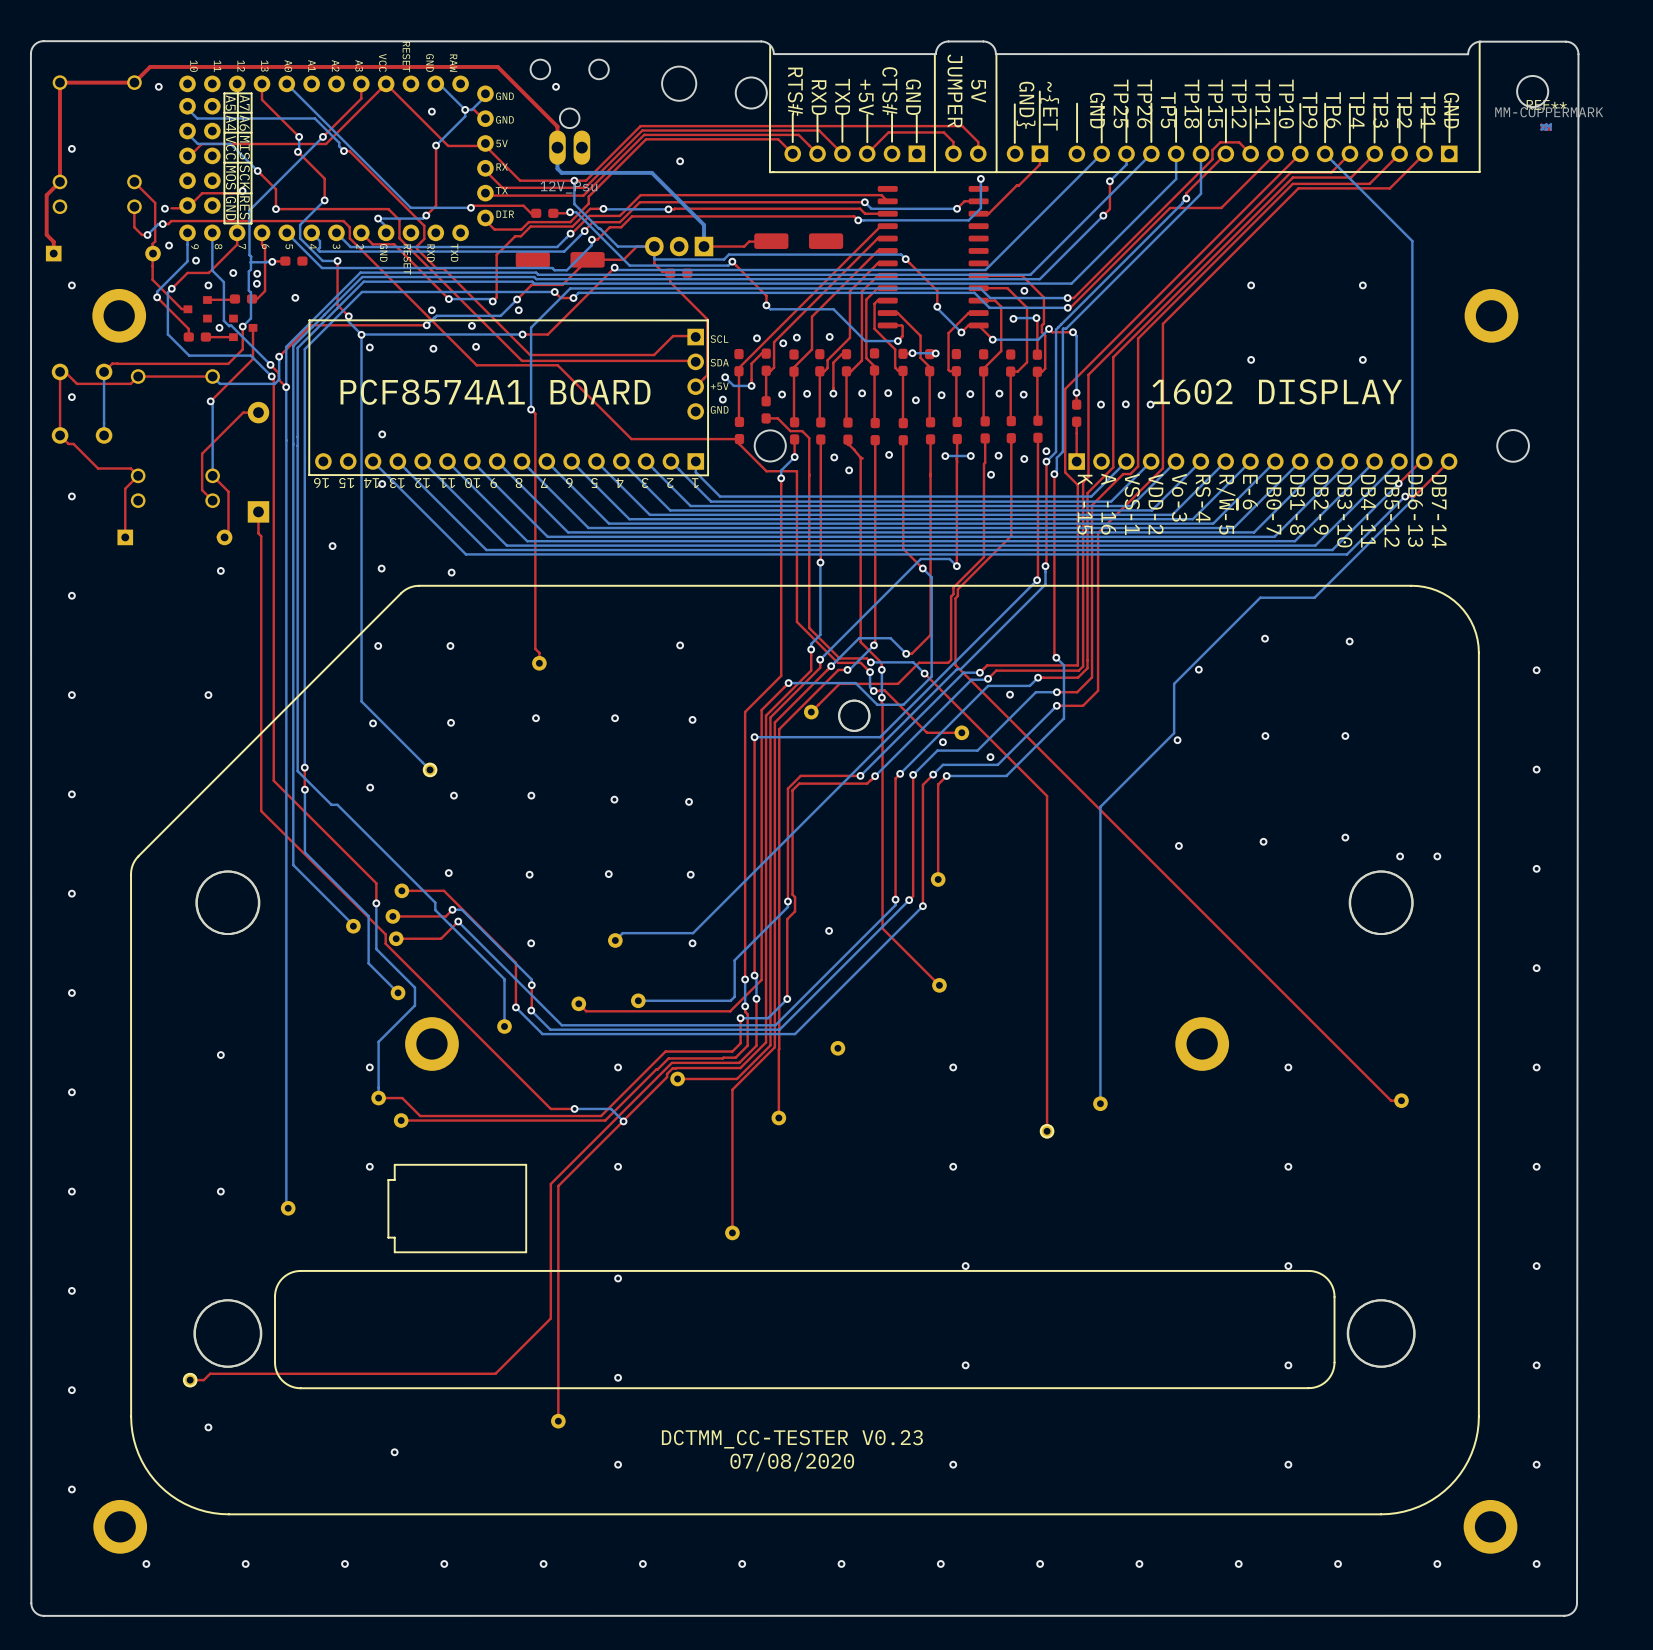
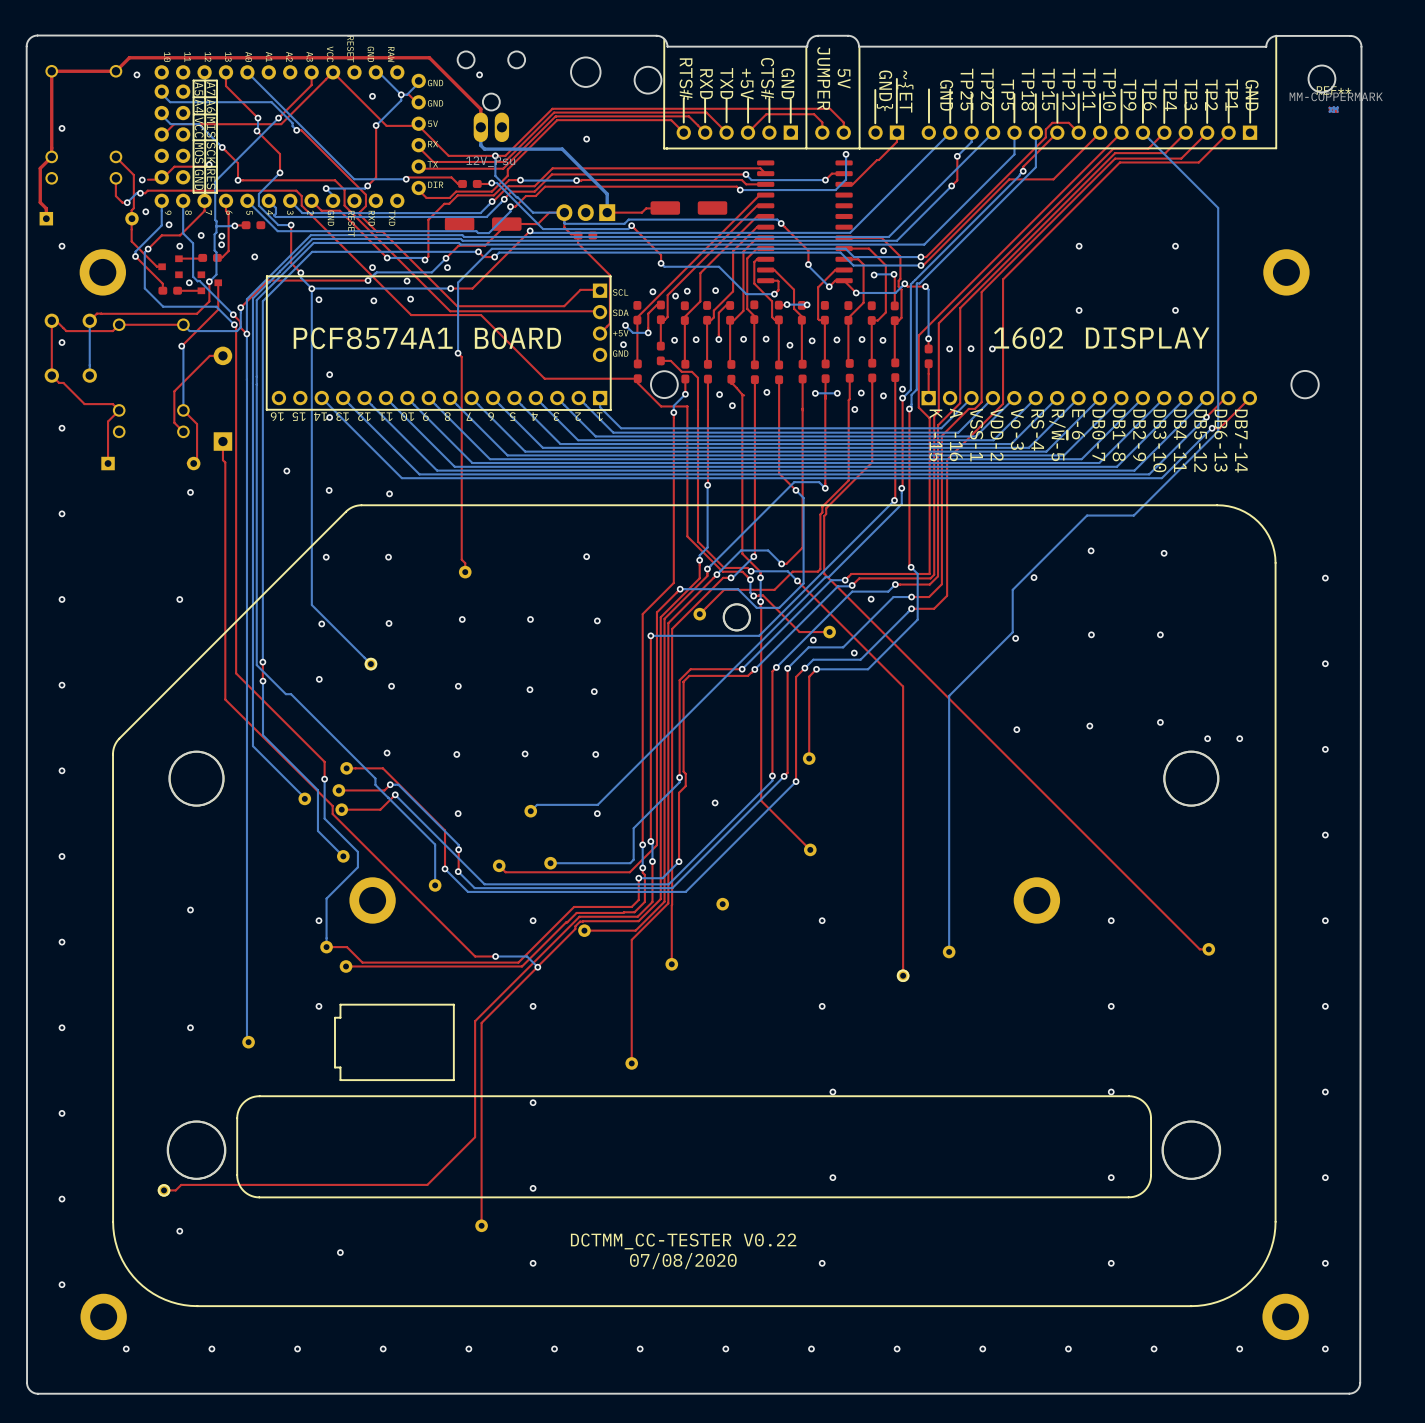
text: DCTMM_CC-TESTER V0.23 (792, 1439) -> DCTMM_CC-TESTER V0.22 (683, 1241)

